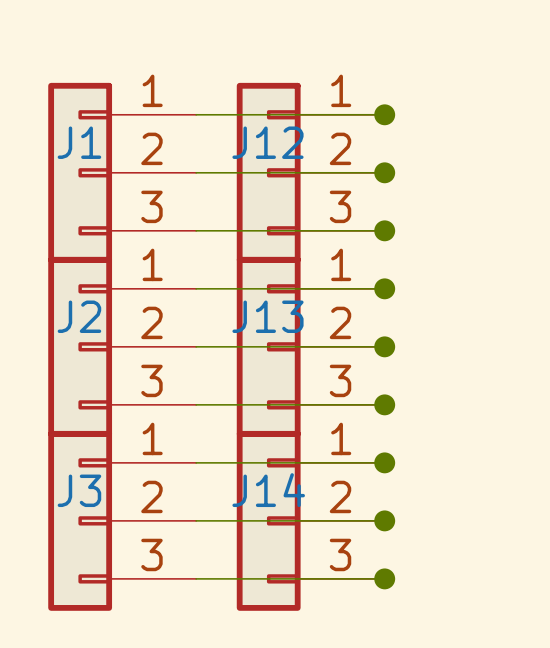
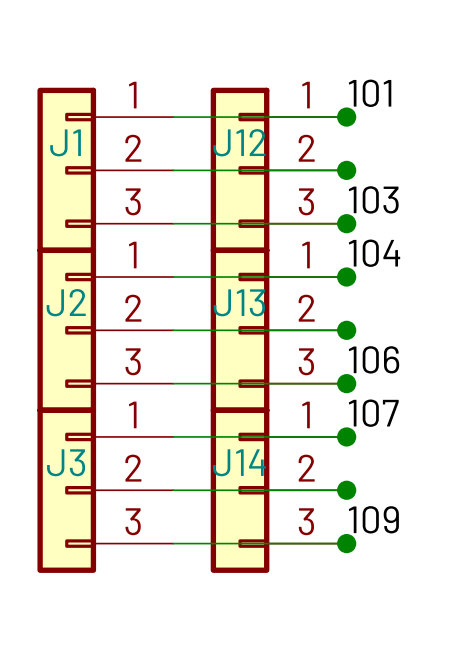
label: none -> 101 (370, 93)
label: none -> 103 (373, 199)
label: none -> 104 (374, 253)
label: none -> 106 (374, 359)
label: none -> 107 (373, 413)
label: none -> 109 (373, 519)

